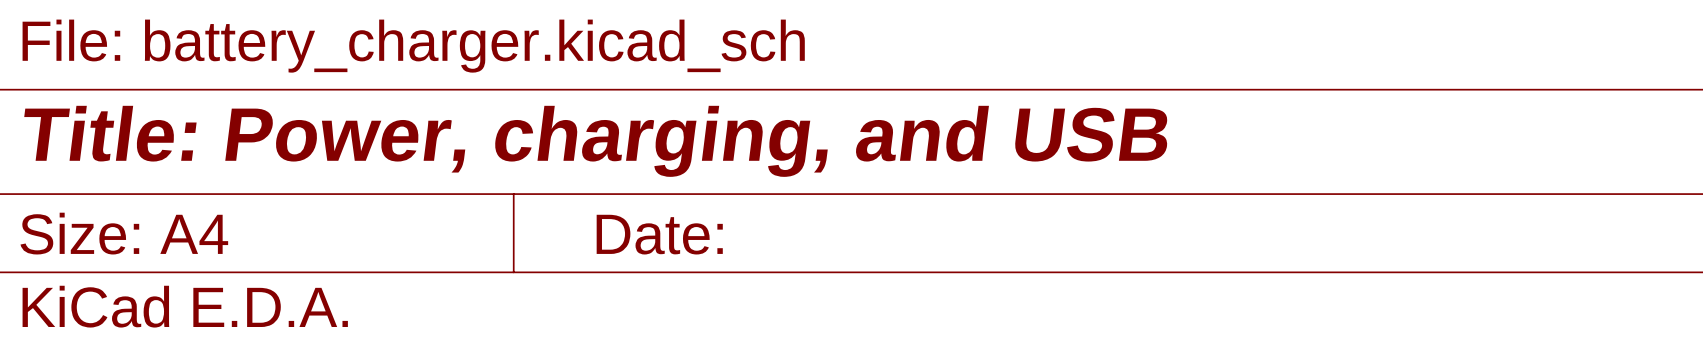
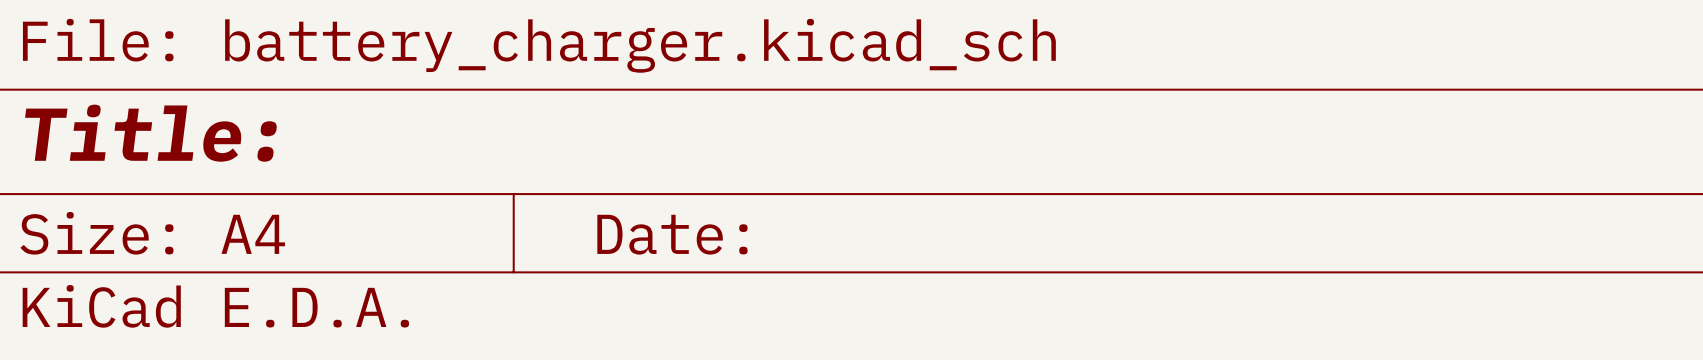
title block: Title: Power, charging, and USB (596, 141) -> Title: (151, 133)

